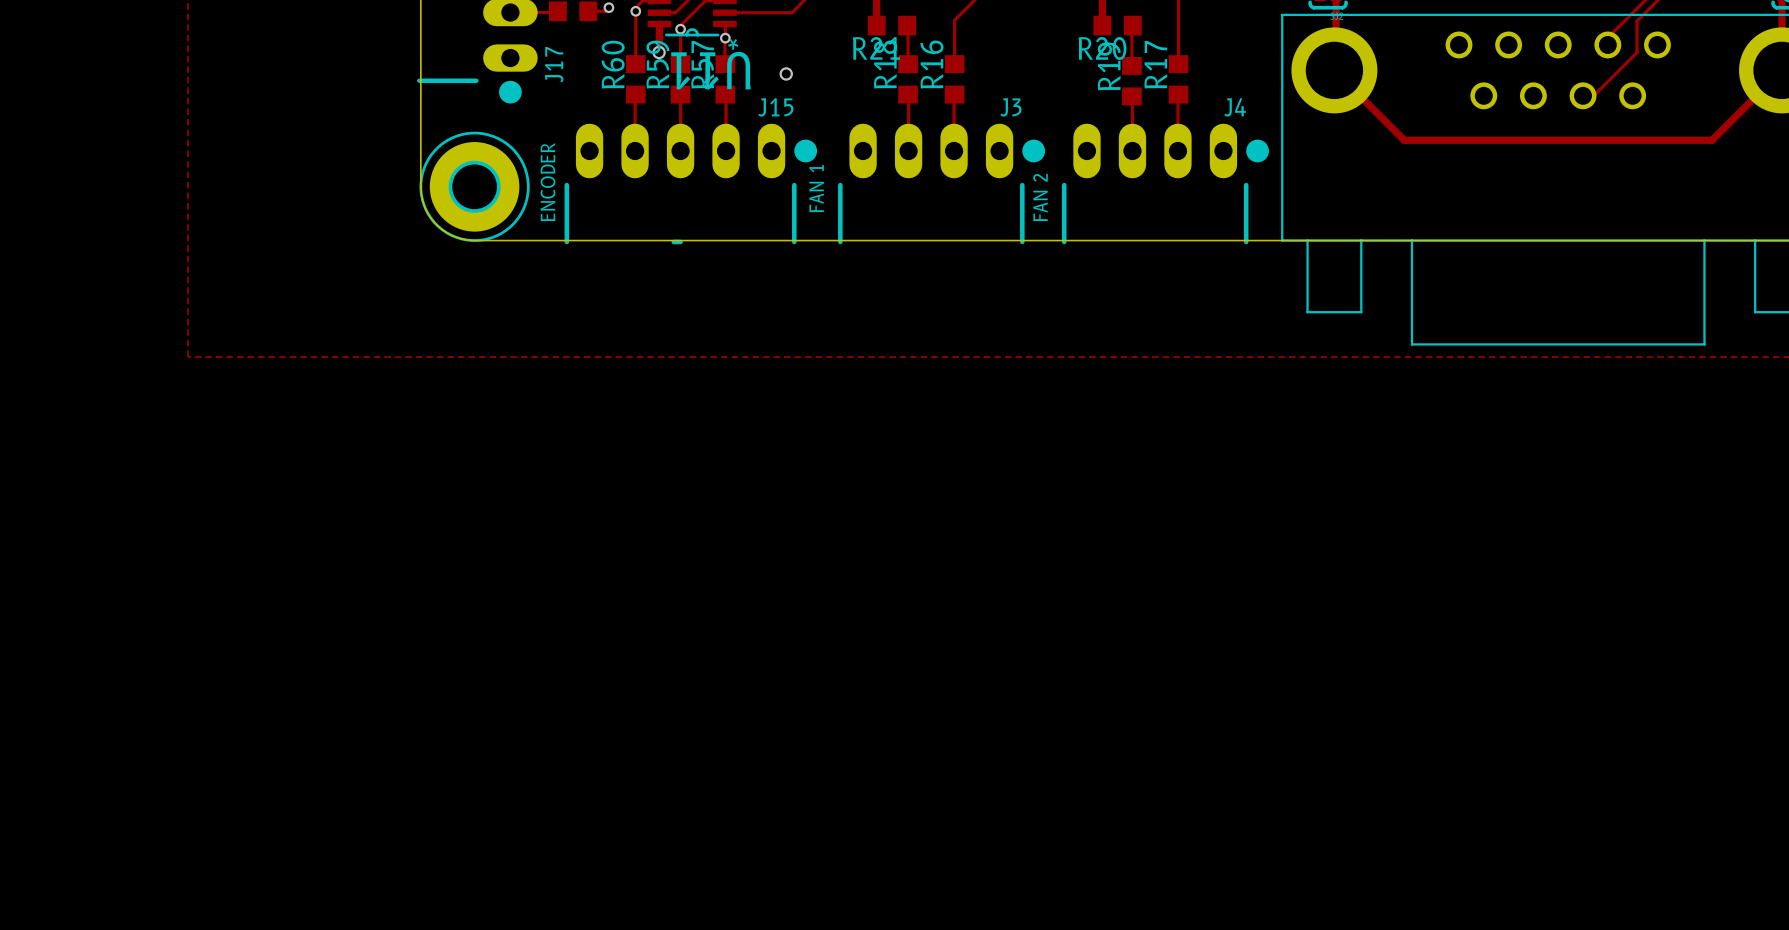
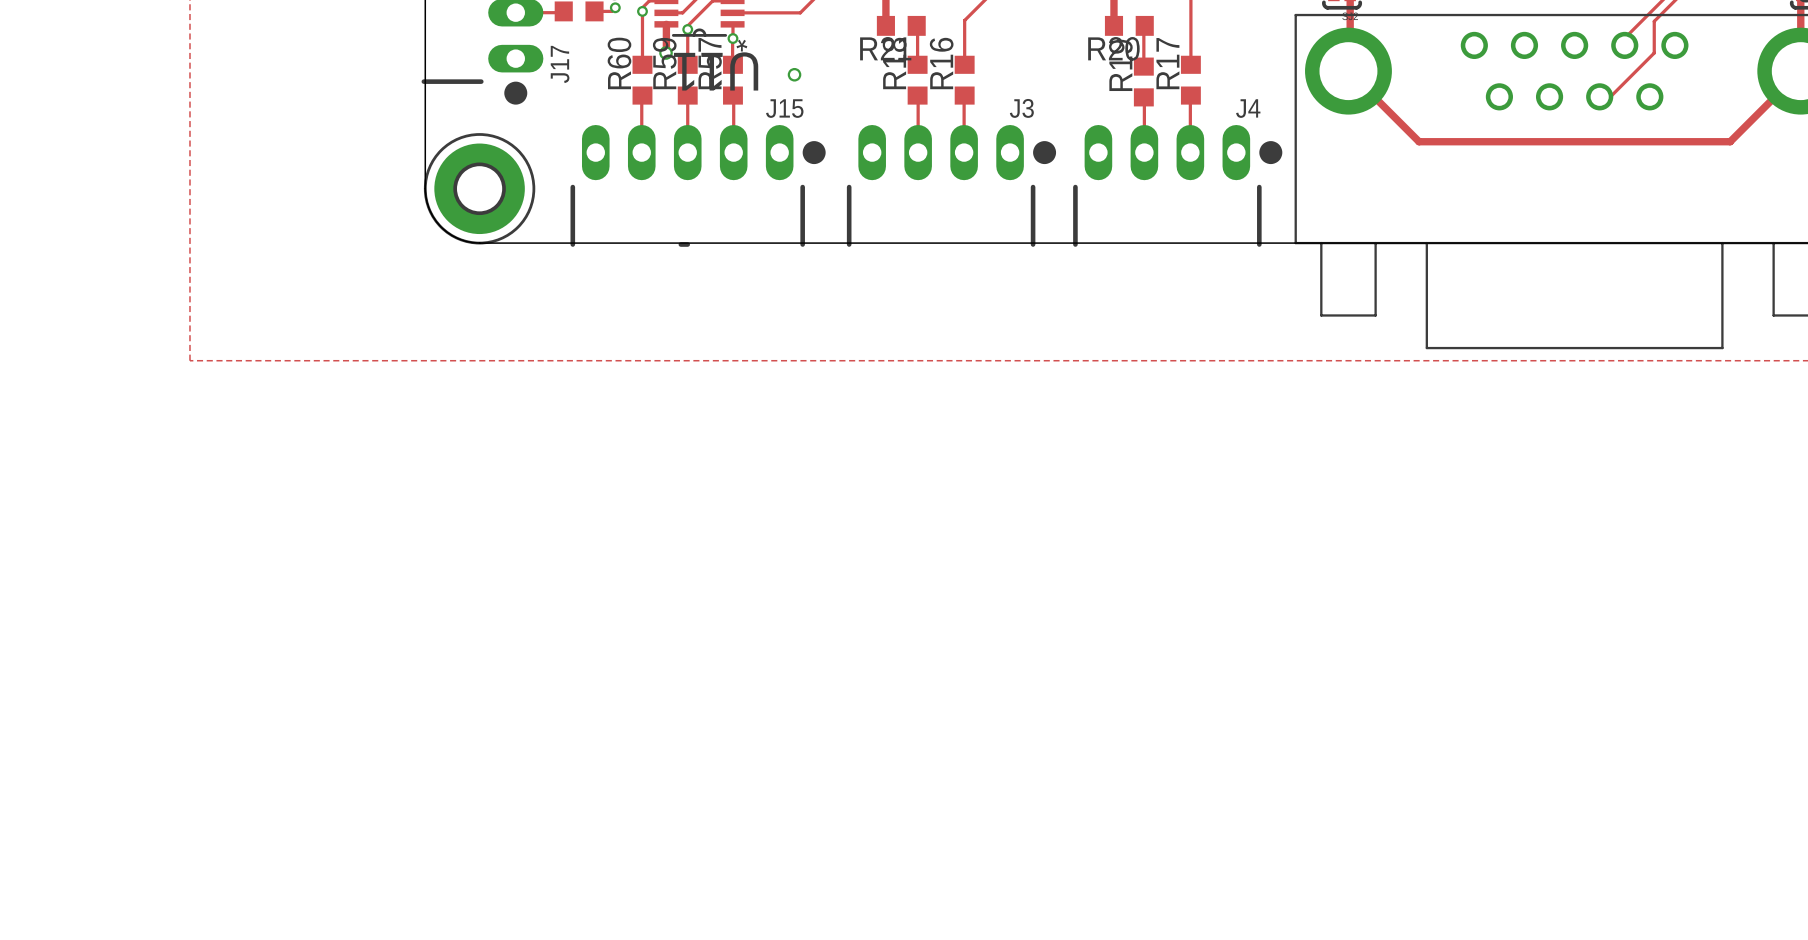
text: ENCODER (547, 182) -> none
text: FAN 1 (816, 188) -> none
text: FAN 2 (1040, 197) -> none

